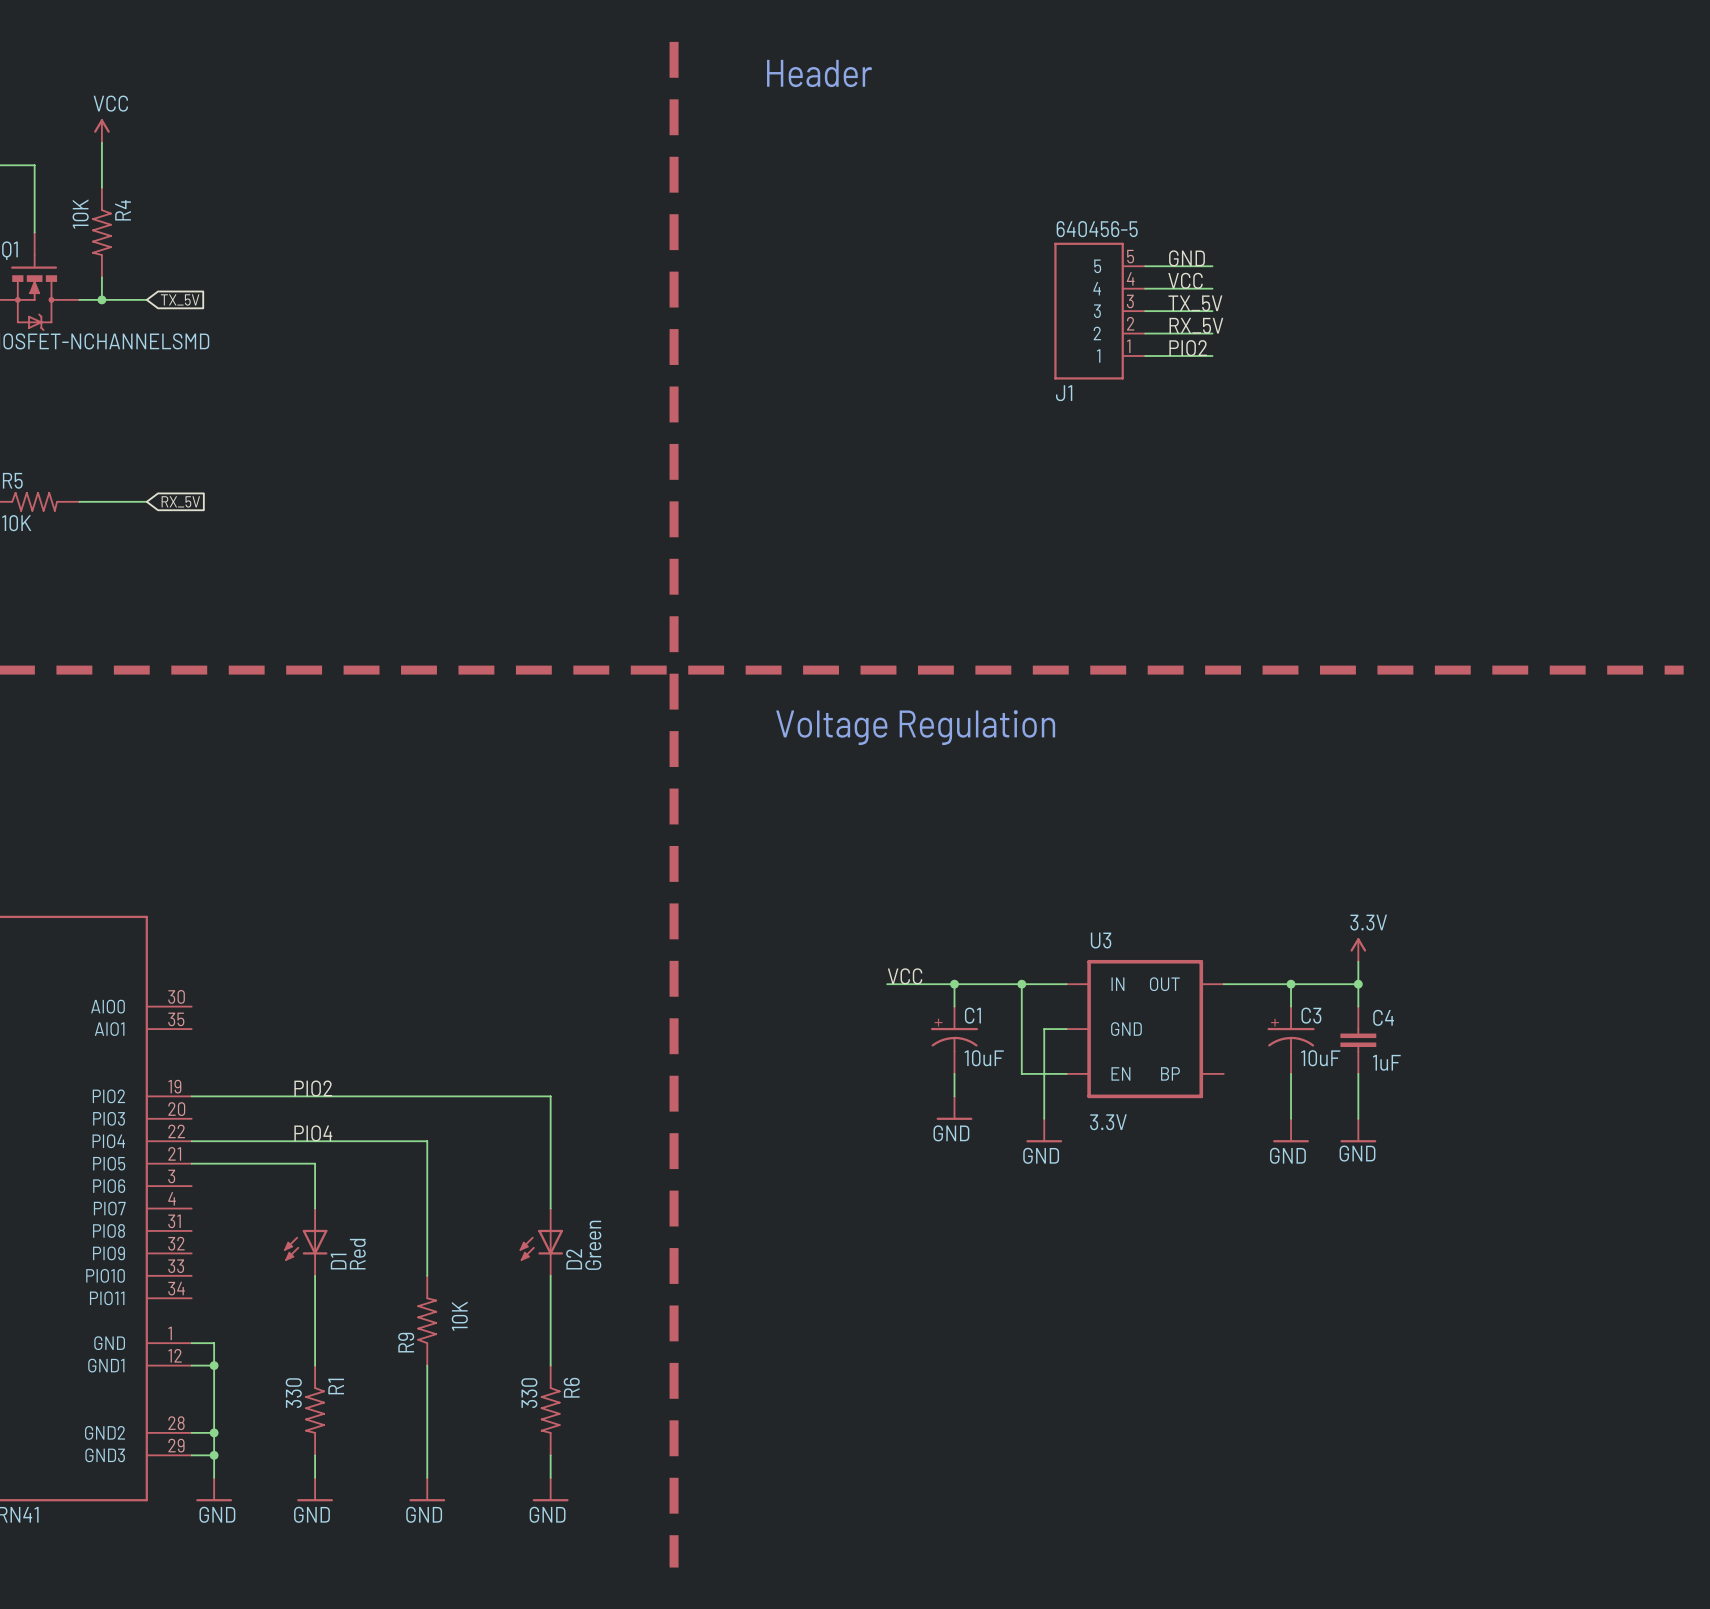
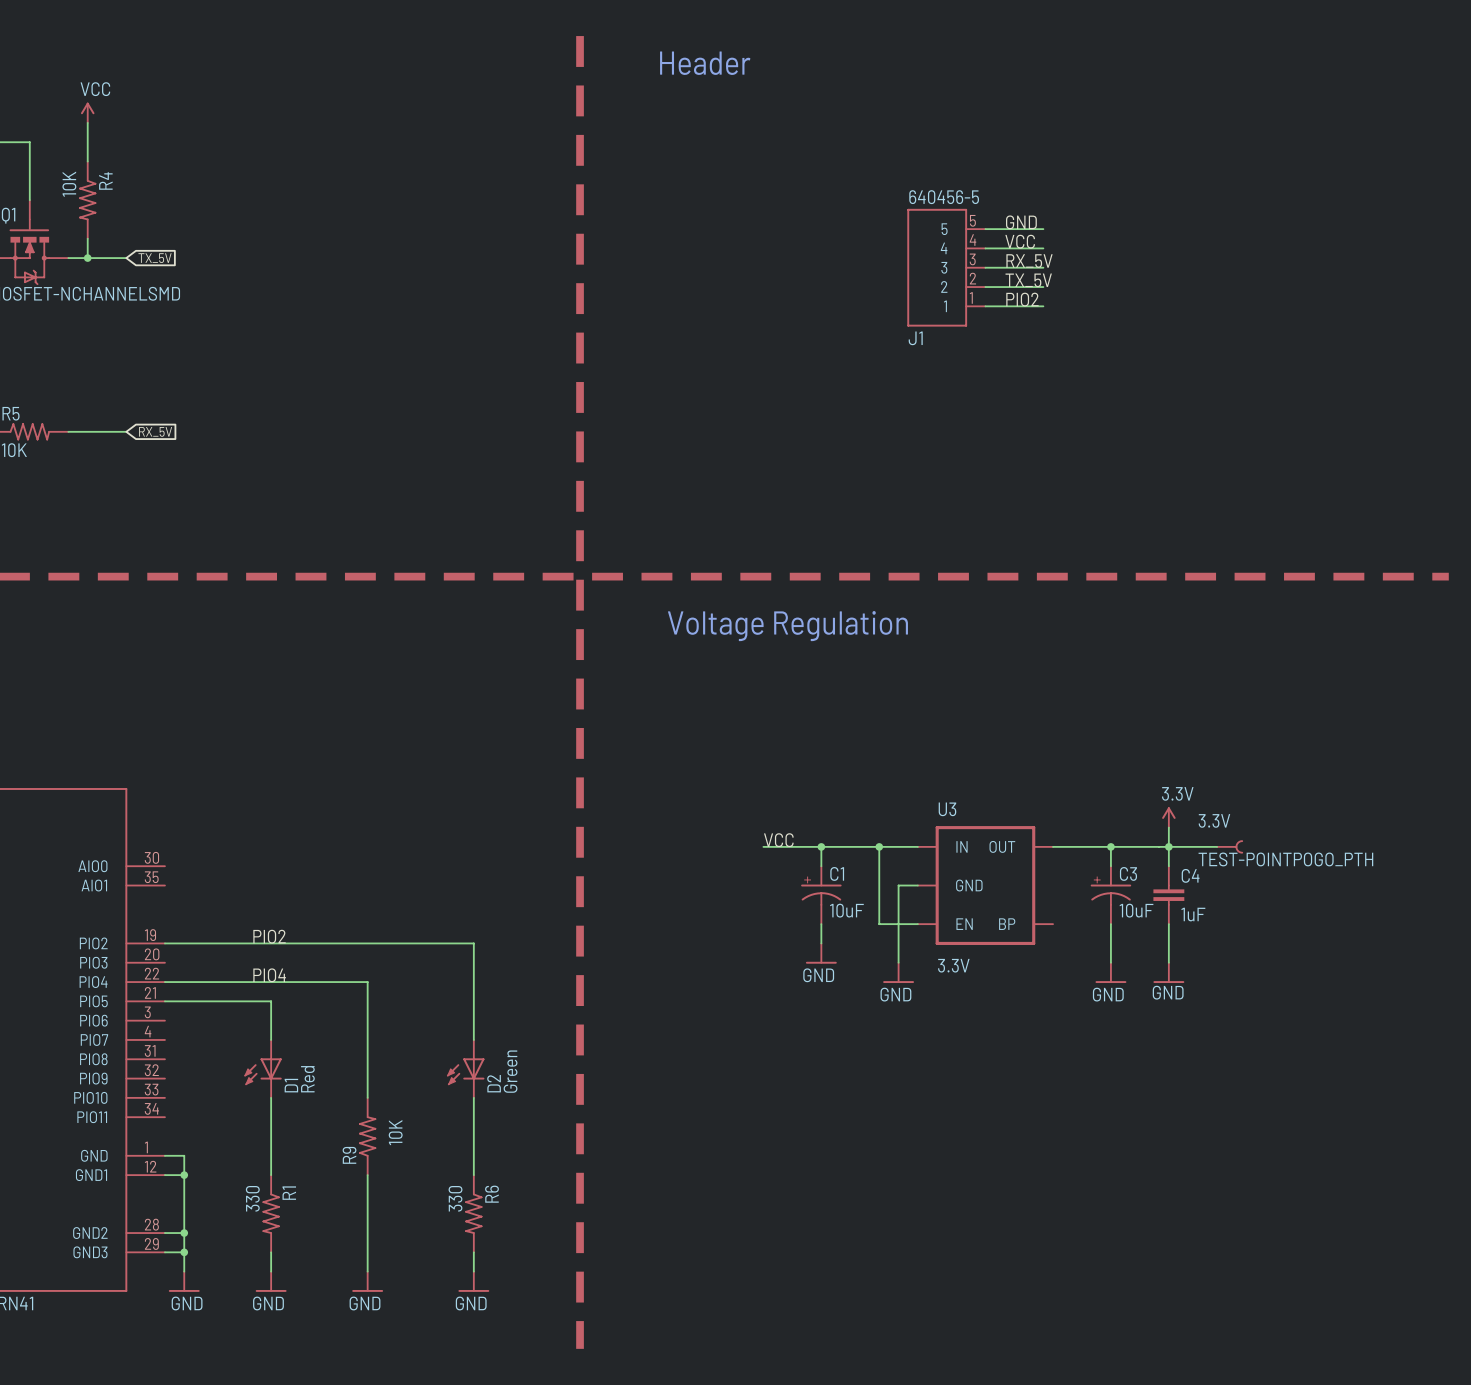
label: TX_5V (1195, 303) -> RX_5V (1029, 261)
label: RX_5V (1196, 325) -> TX_5V (1028, 280)
wire: none -> (1168, 846) (1217, 846)
3.3V: none -> TEST-POINTPOGO_PTH (1229, 846)

